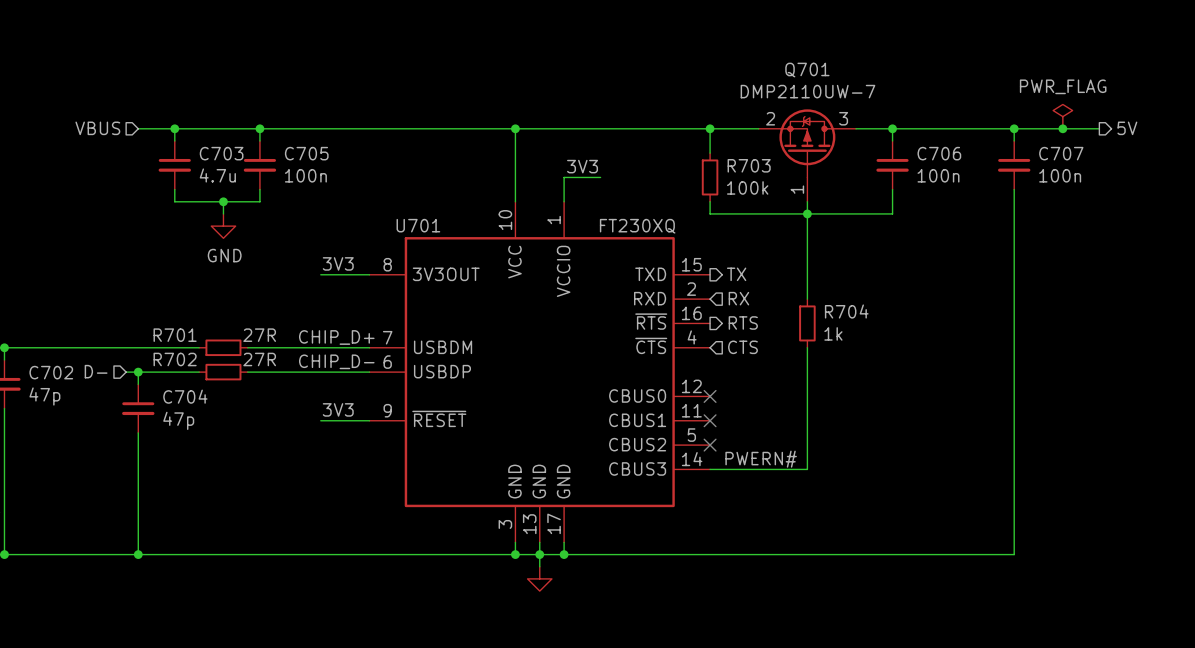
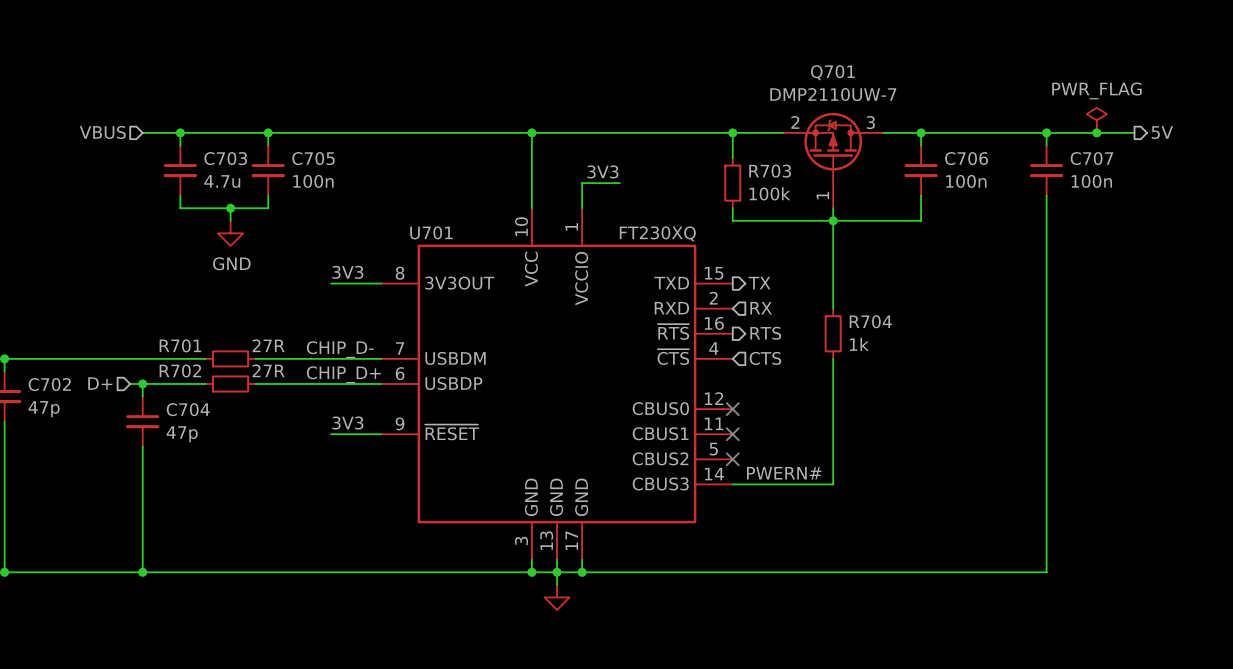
label: CHIP_D+ (336, 337) -> CHIP_D- (340, 349)
label: CHIP_D- (336, 361) -> CHIP_D+ (343, 374)
hierarchical label: D- (96, 371) -> D+ (100, 383)

